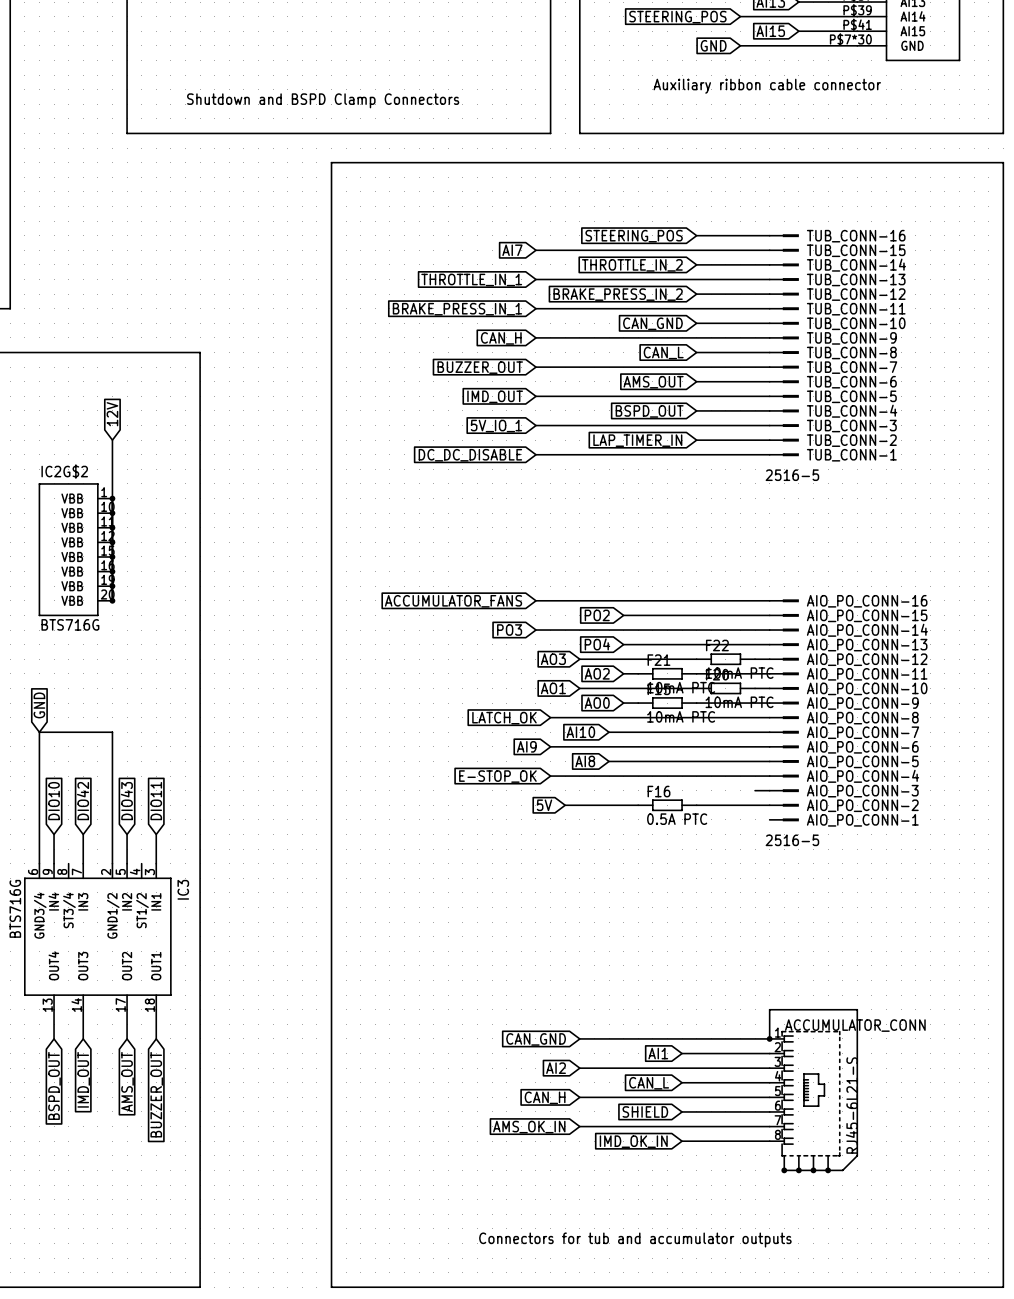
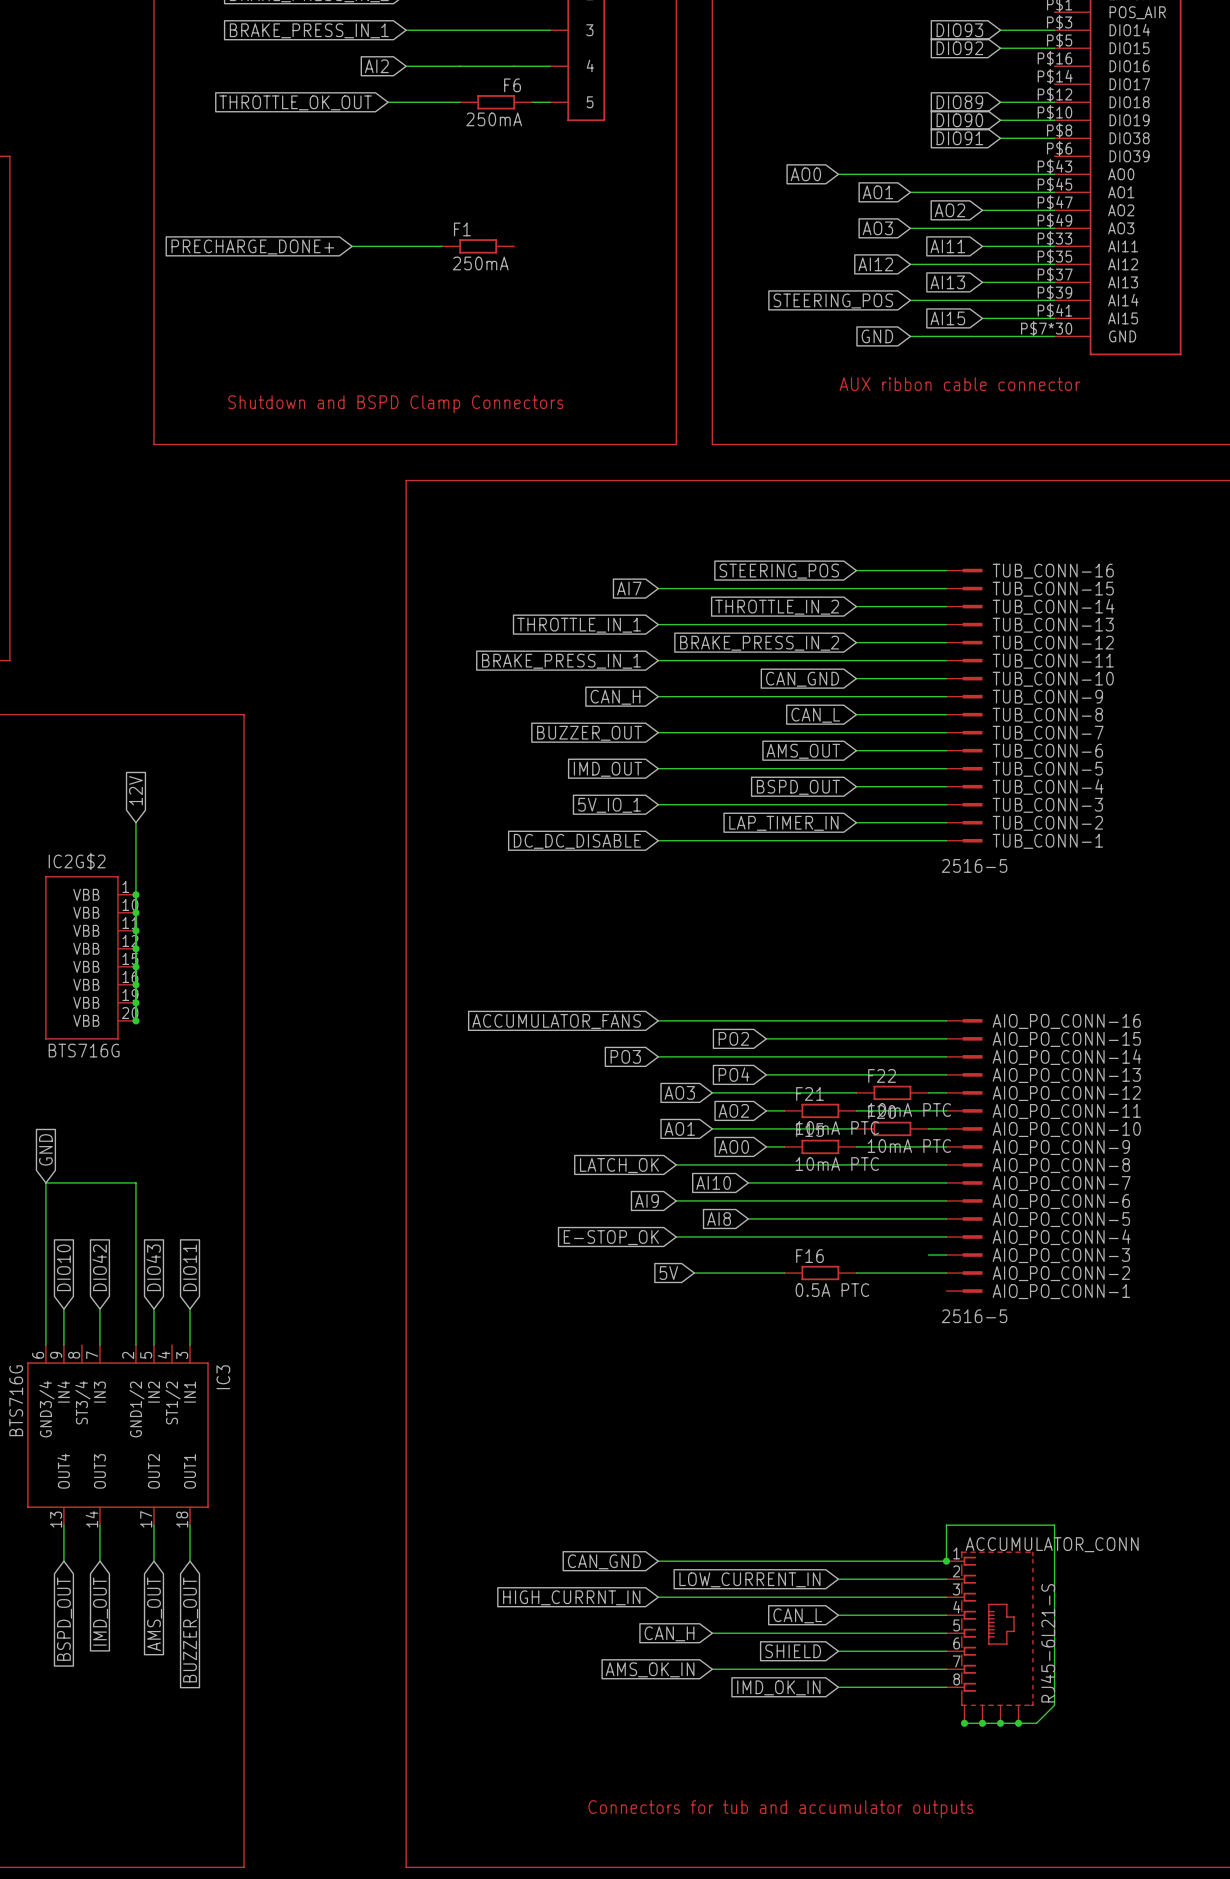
text: Auxiliary ribbon cable connector (767, 86) -> AUX ribbon cable connector (959, 384)
wire: none -> (658, 1561) (712, 1561)
global label position: CAN_GND (536, 1039) -> CAN_GND (604, 1561)
global label: AI1 (658, 1053) -> LOW_CURRENT_IN (749, 1579)
global label: none -> HIGH_CURRNT_IN (571, 1597)
wire: none -> (658, 1597) (712, 1597)
global label: AI2 (556, 1068) -> none

